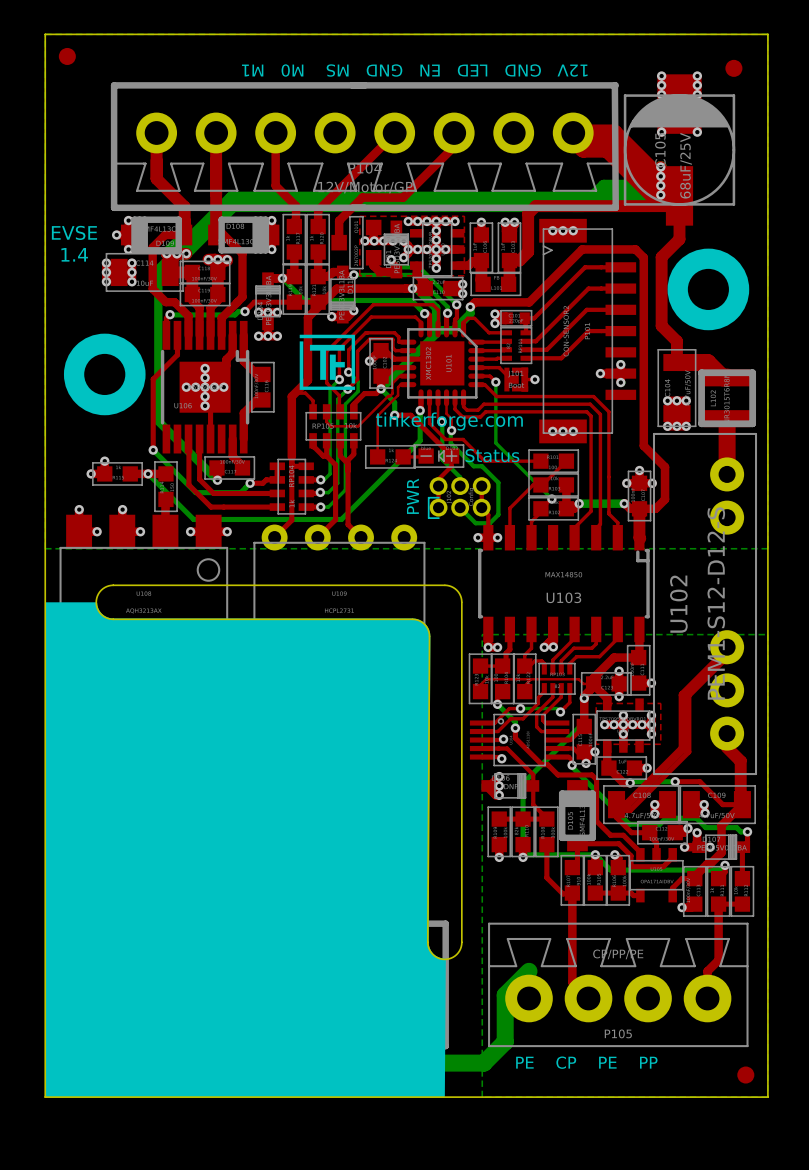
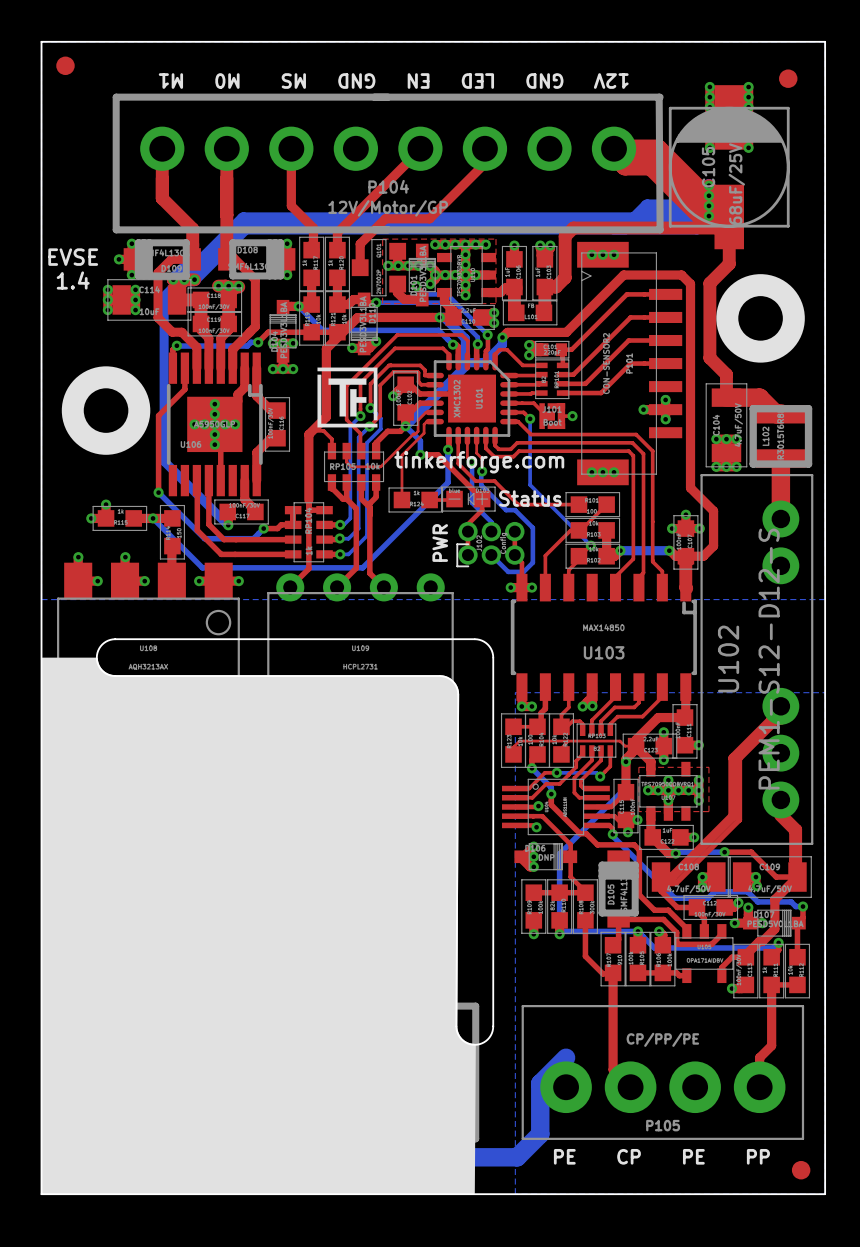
P104 footprint: [110, 82, 619, 212] -> [112, 93, 664, 234]
P105 footprint: [488, 922, 749, 1048] -> [521, 1005, 805, 1140]

